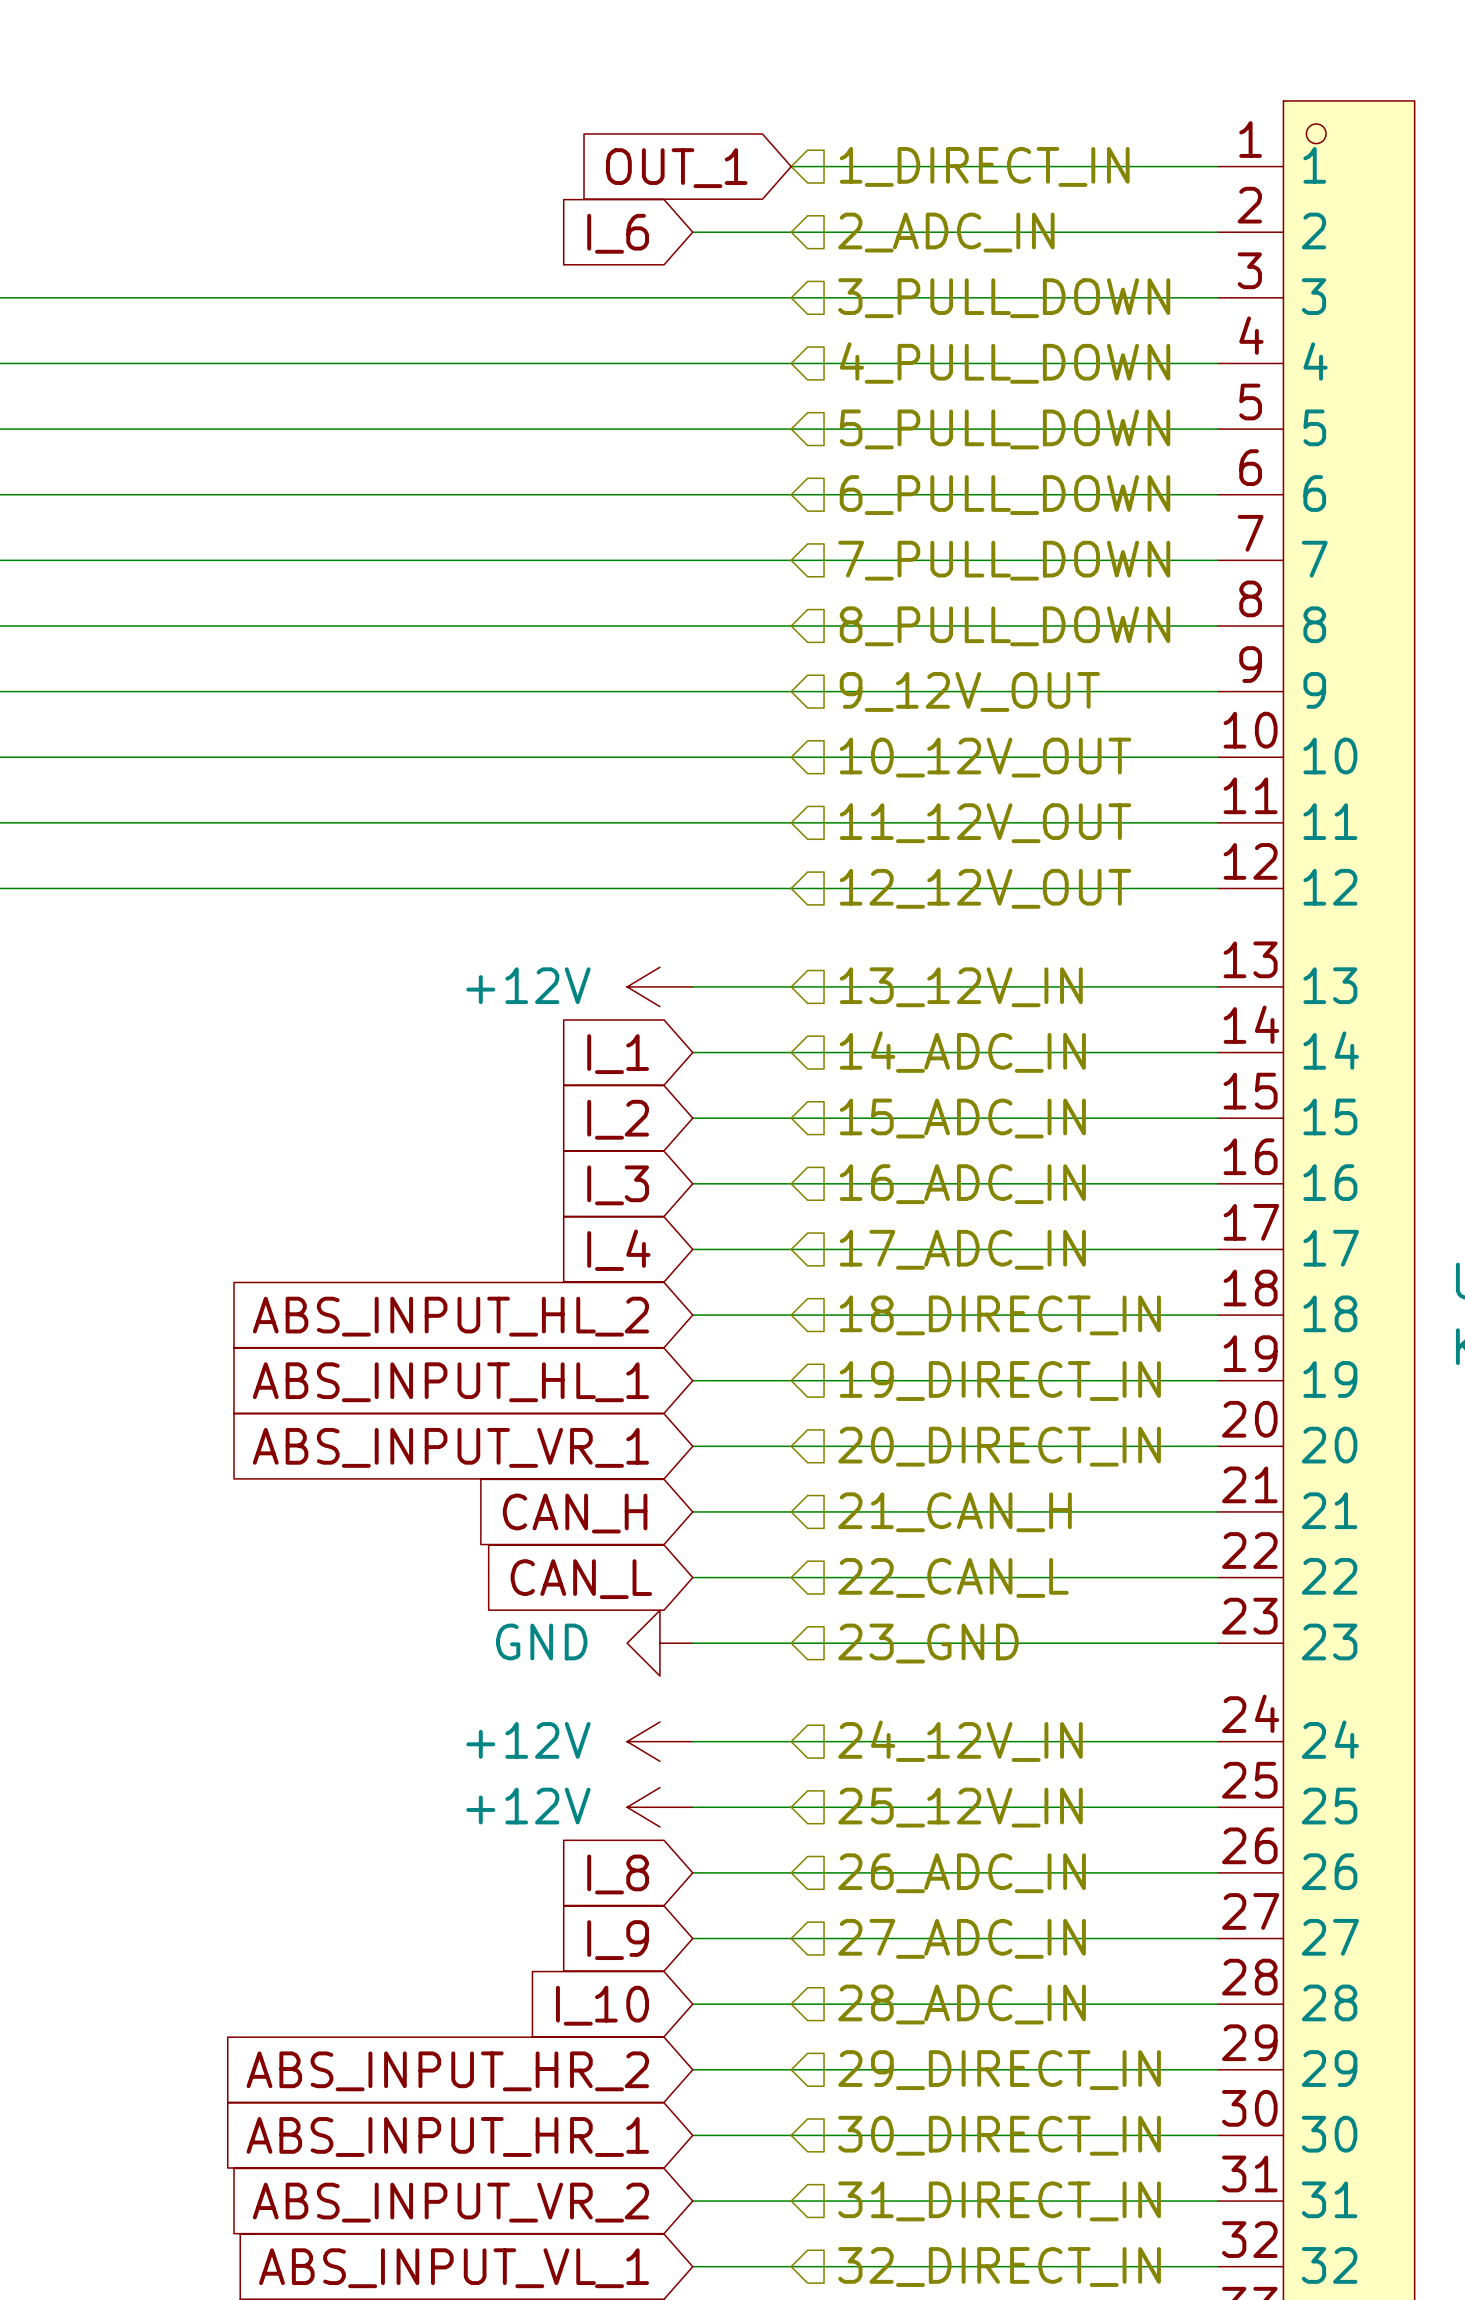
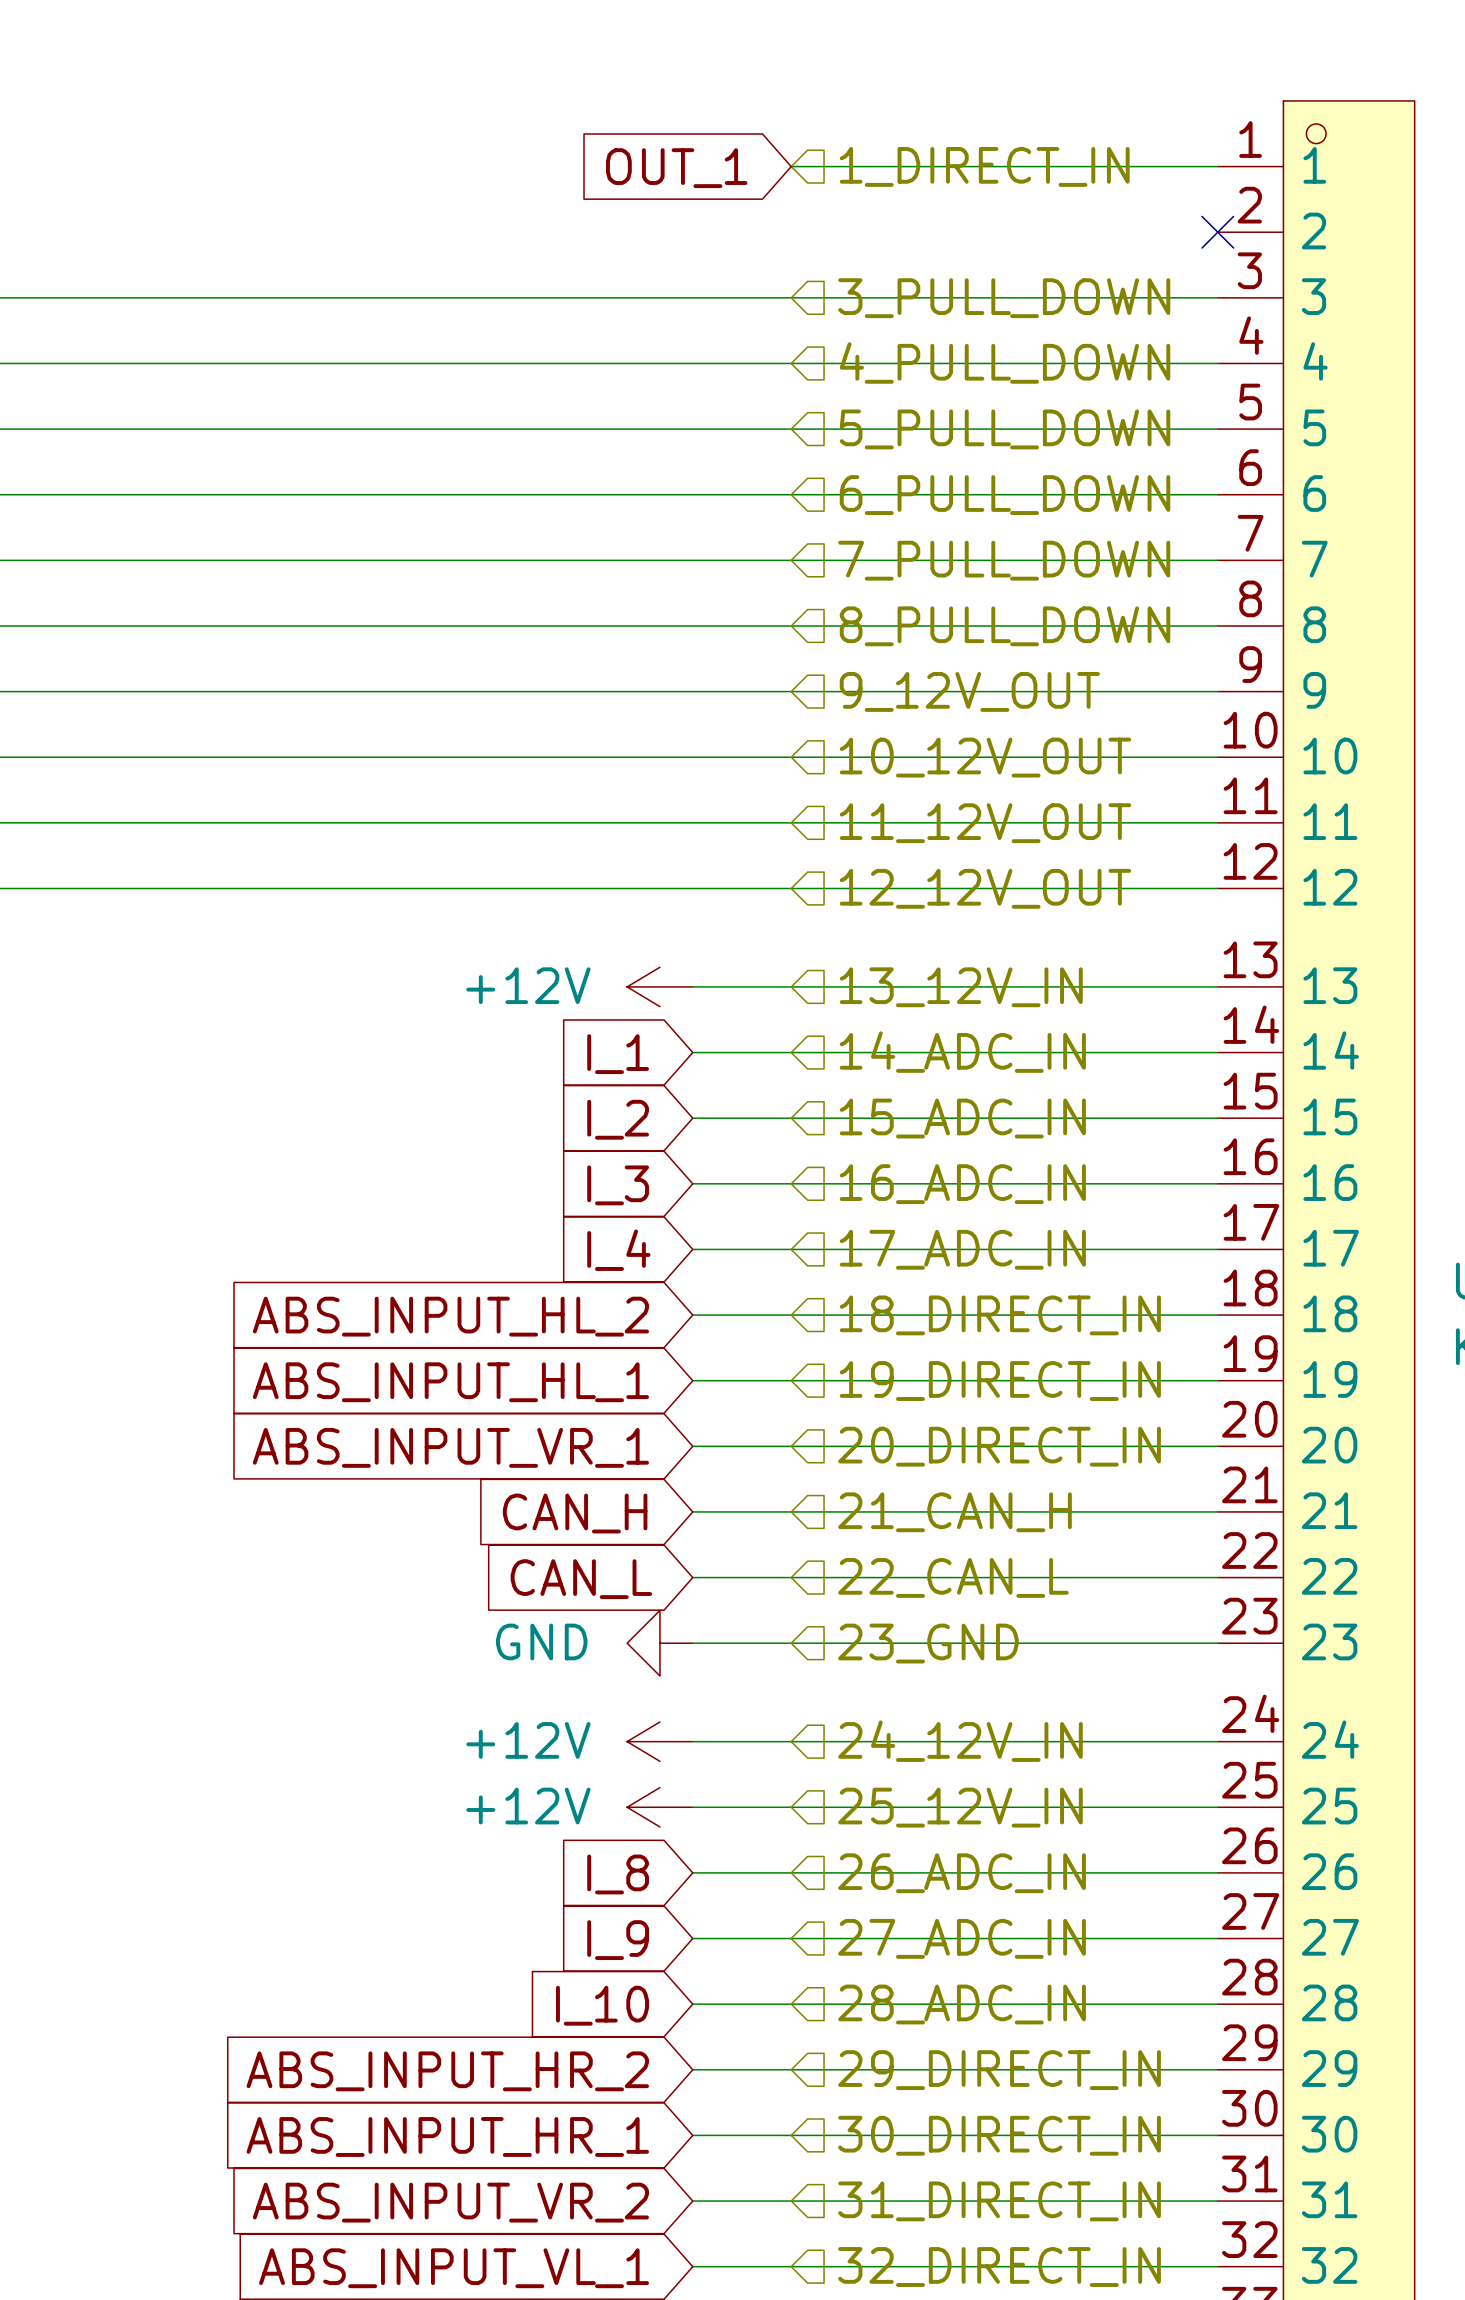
wire: (692, 232) (1217, 232) -> none
hierarchical label: 2_ADC_IN (946, 232) -> none
no-connect mark: none -> (1217, 232)
global label: I_6 (618, 233) -> none

